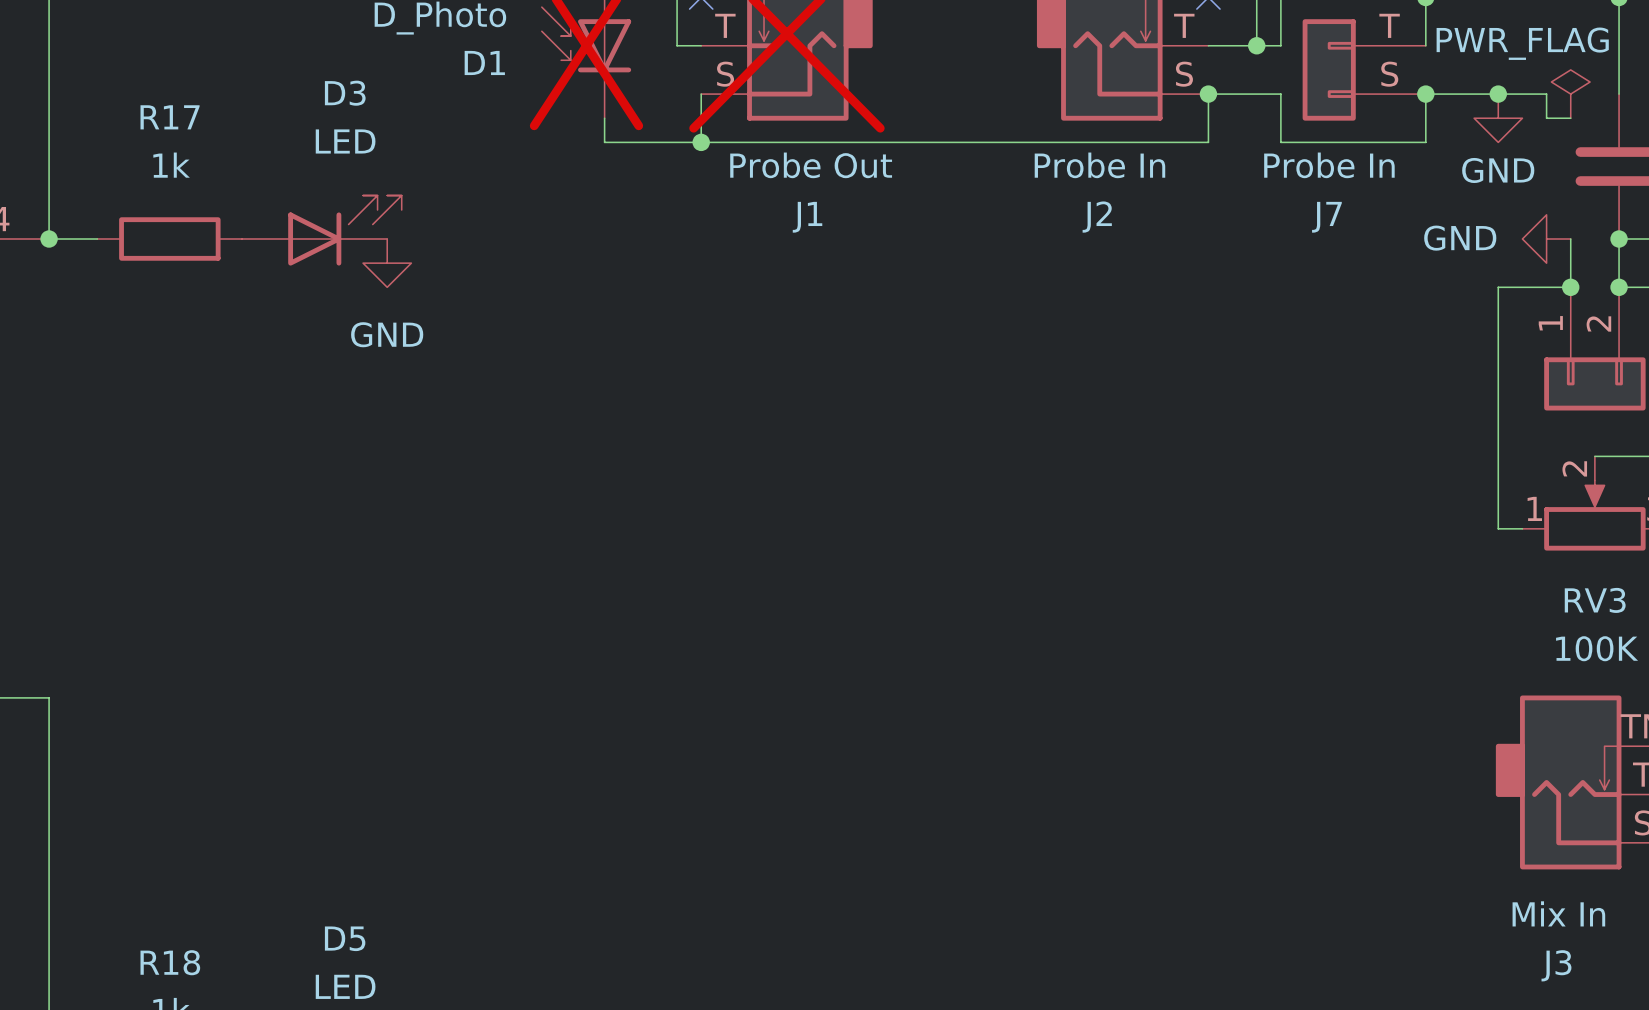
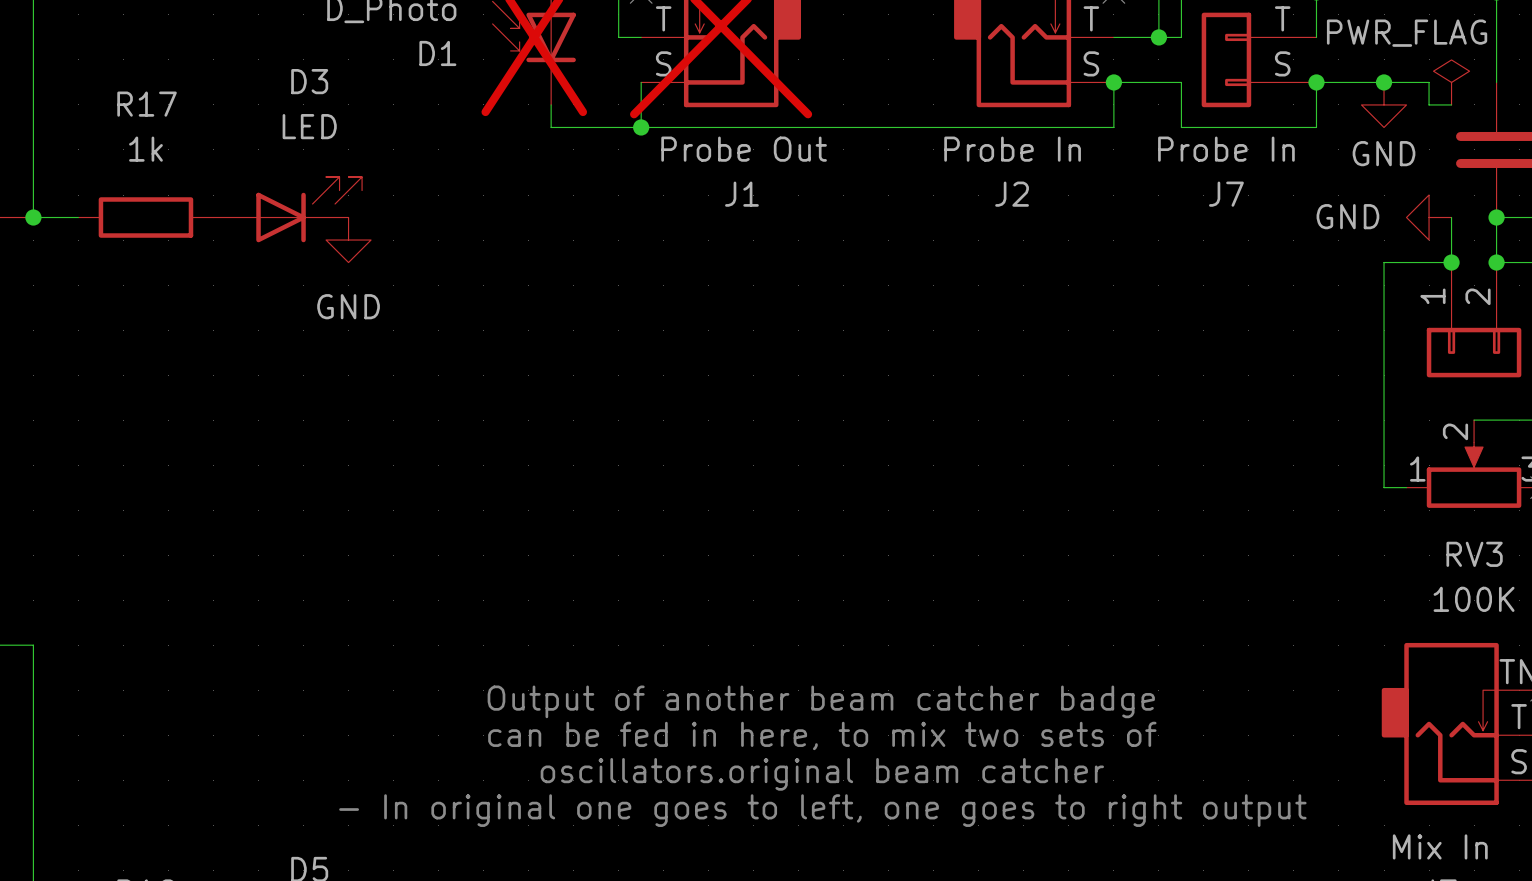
text: none -> Output of another beam catcher badge (821, 701)
text: none -> can be fed in here, to mix two sets of (822, 735)
text: none -> oscillators.original beam catcher (822, 774)
text: none -> - In original one goes to left, one goes to right output (822, 810)

